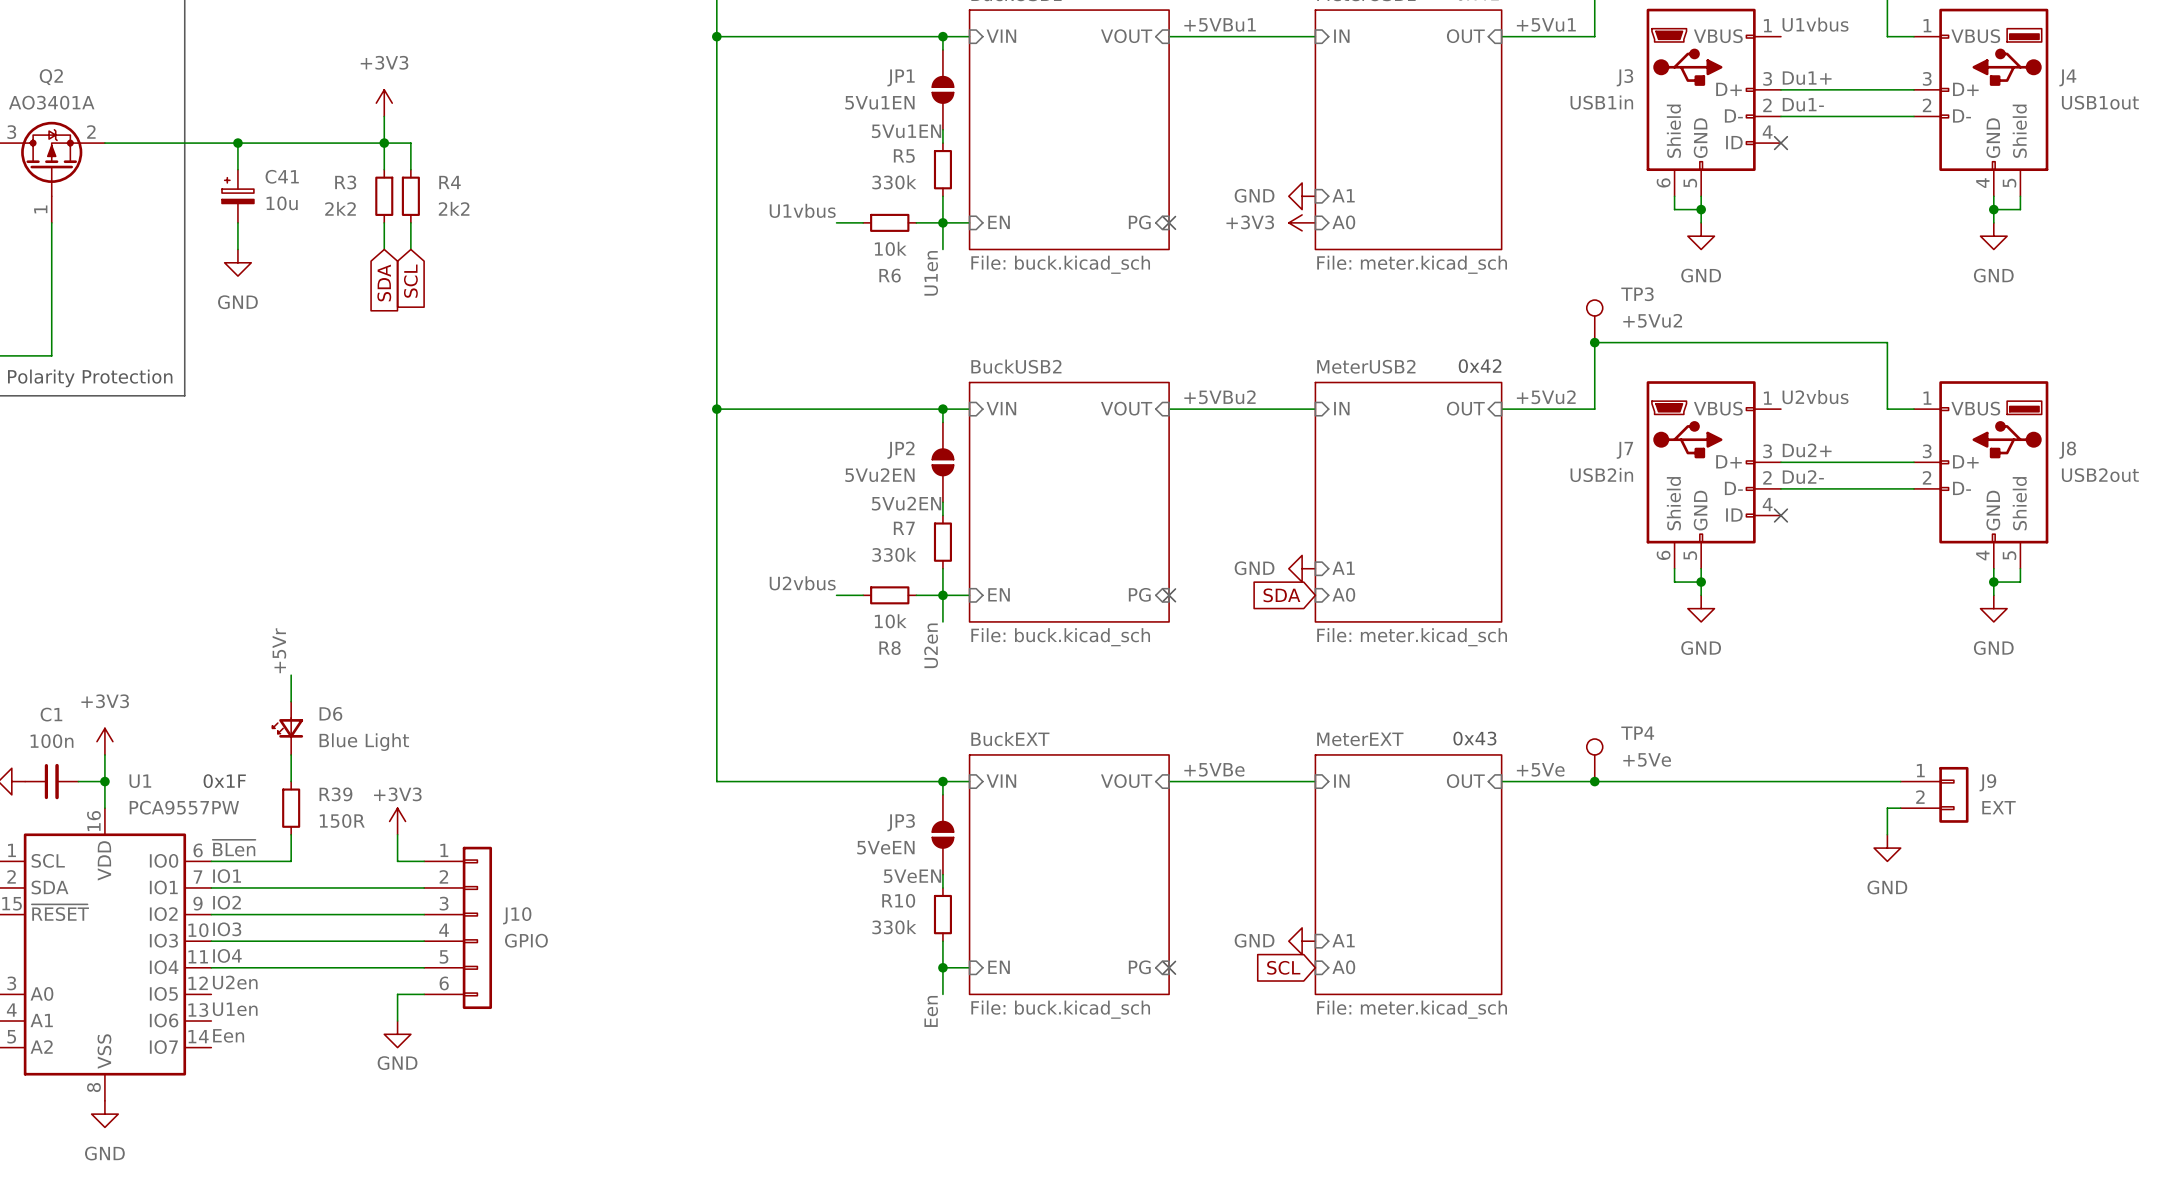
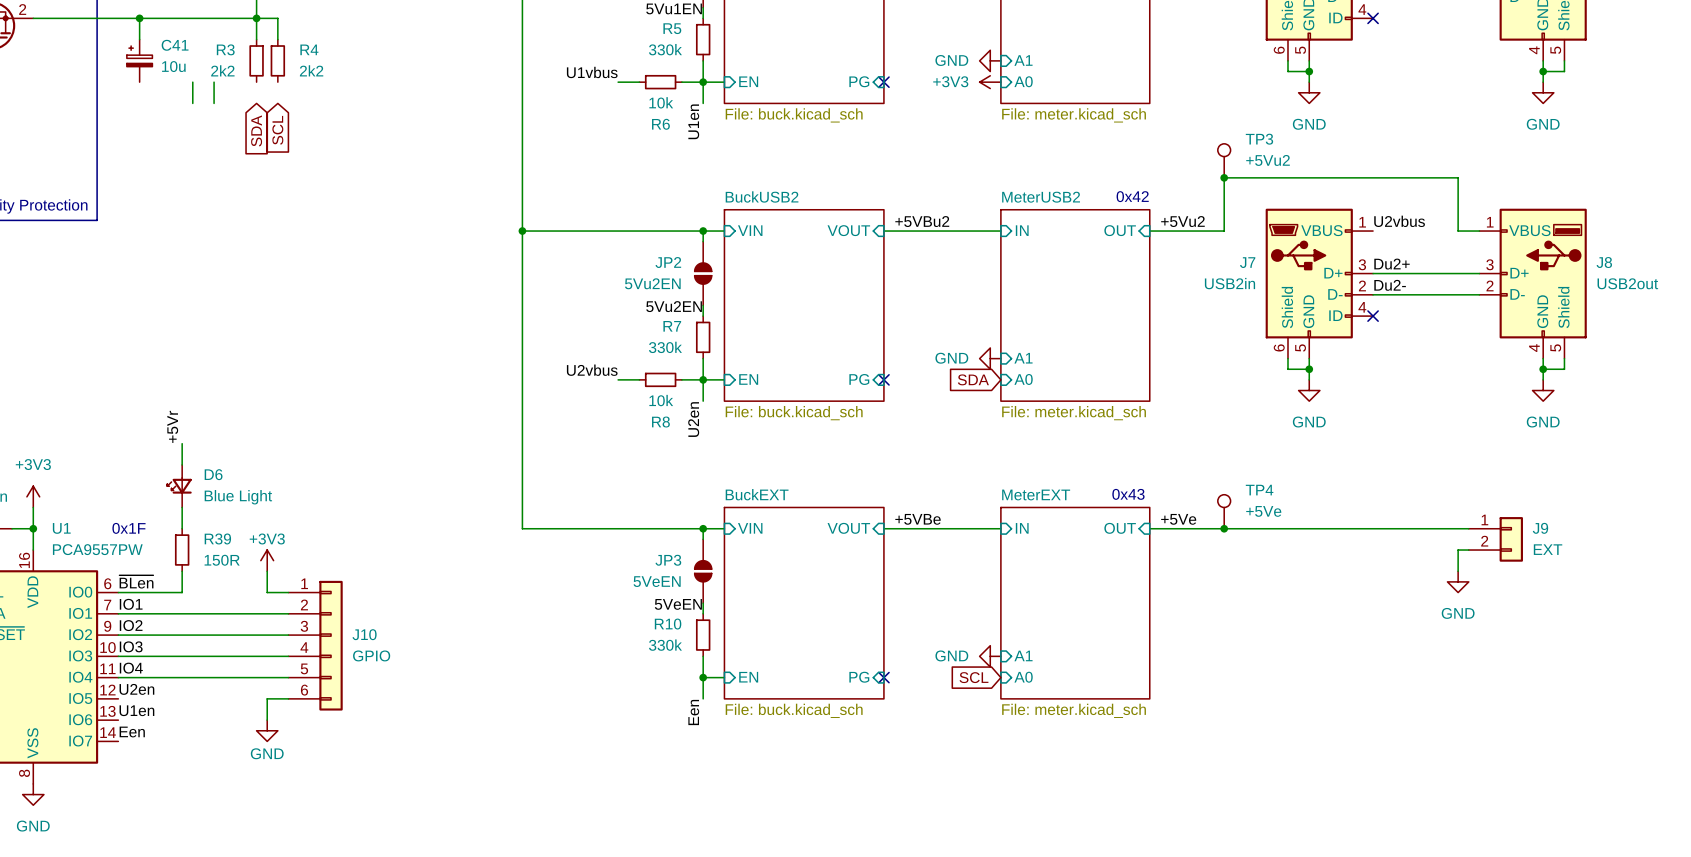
wire: (237, 222) (237, 249) -> none
wire: (384, 222) (384, 249) -> (192, 82) (192, 103)
wire: (410, 222) (410, 249) -> (214, 82) (214, 103)
power symbol: GND (237, 262) -> none

